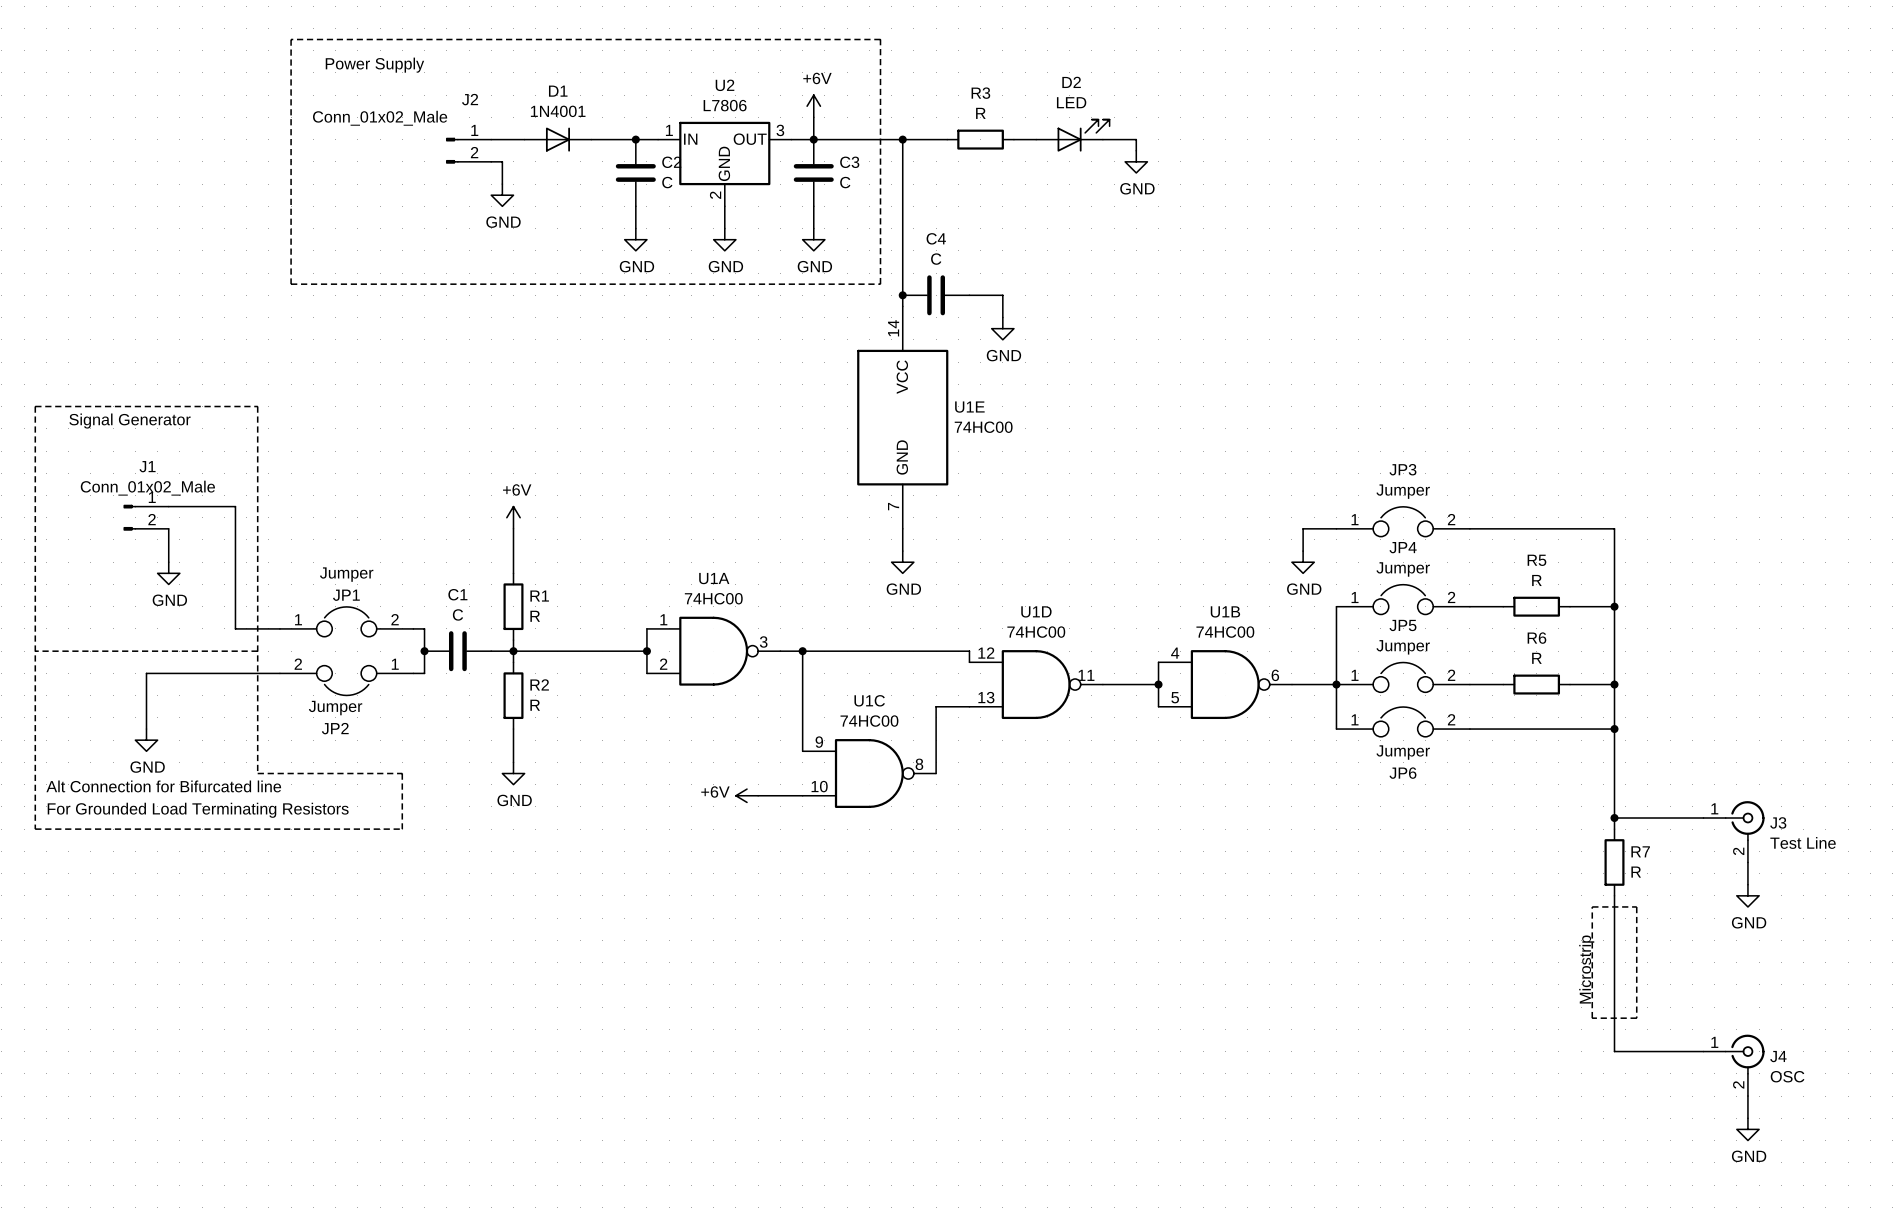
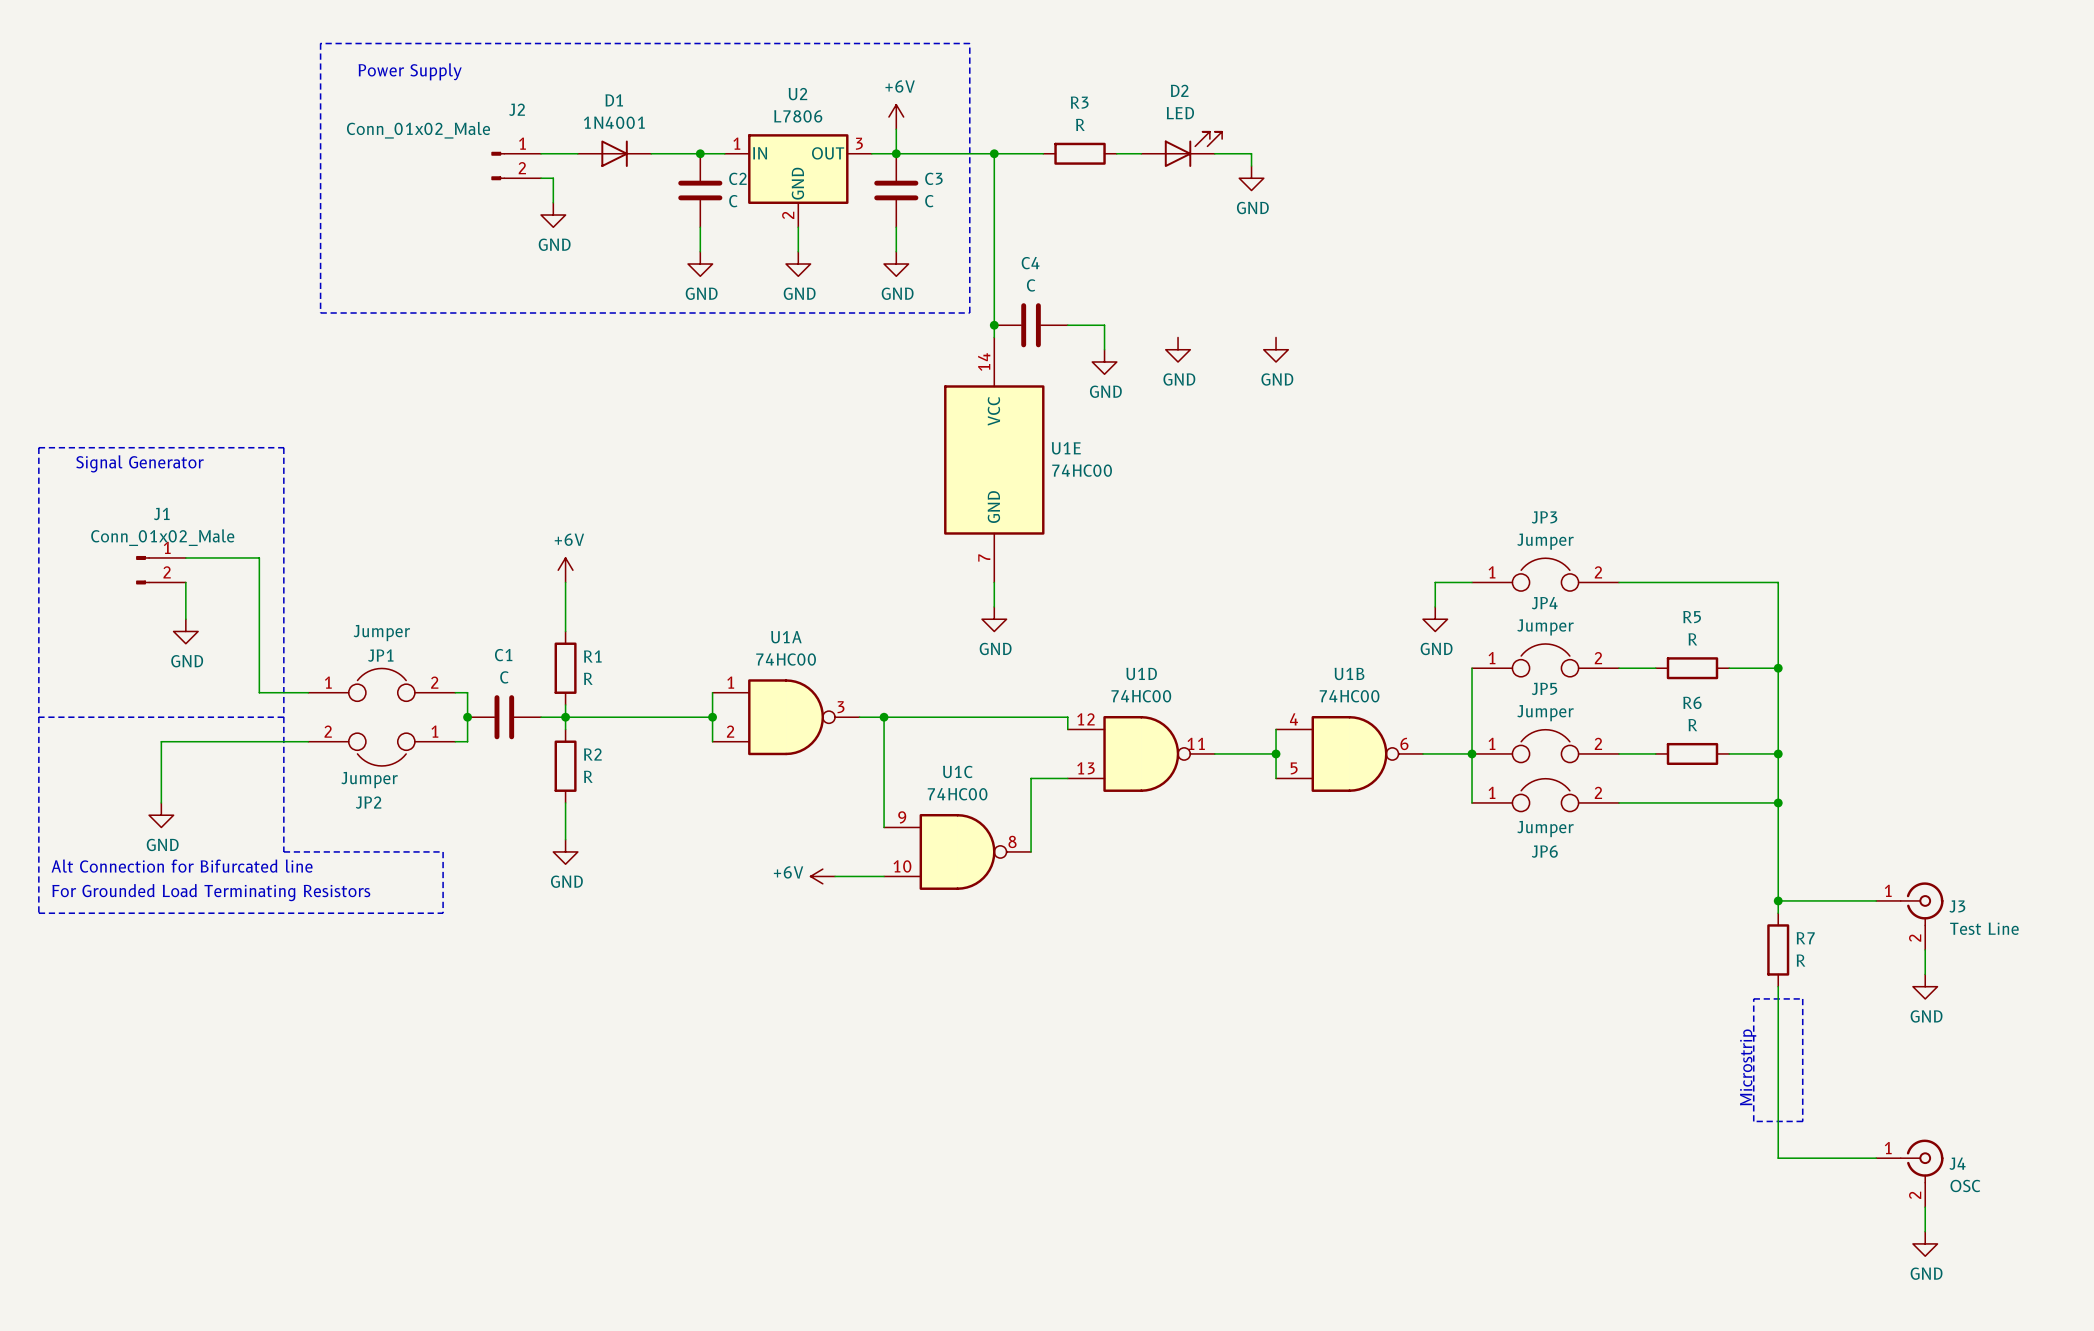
power symbol: none -> GND (1178, 349)
power symbol: none -> GND (1276, 349)

